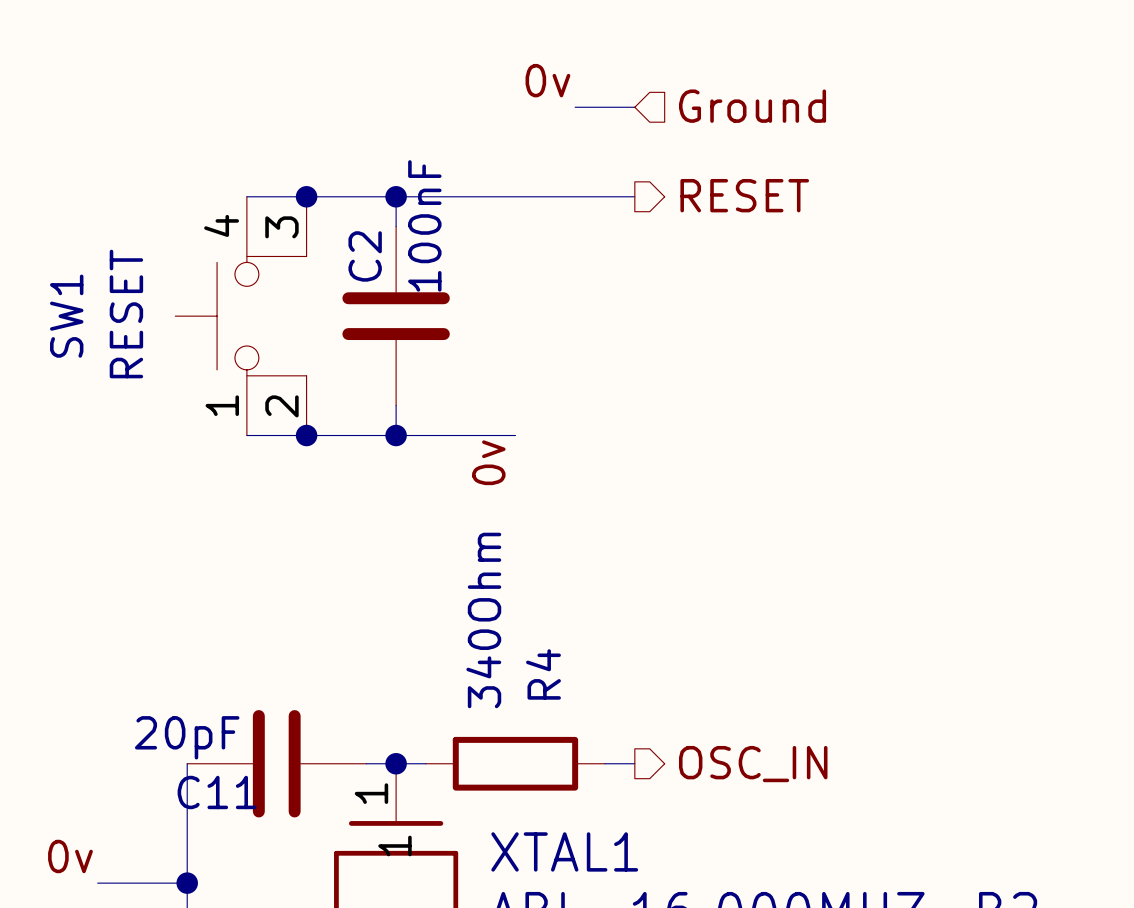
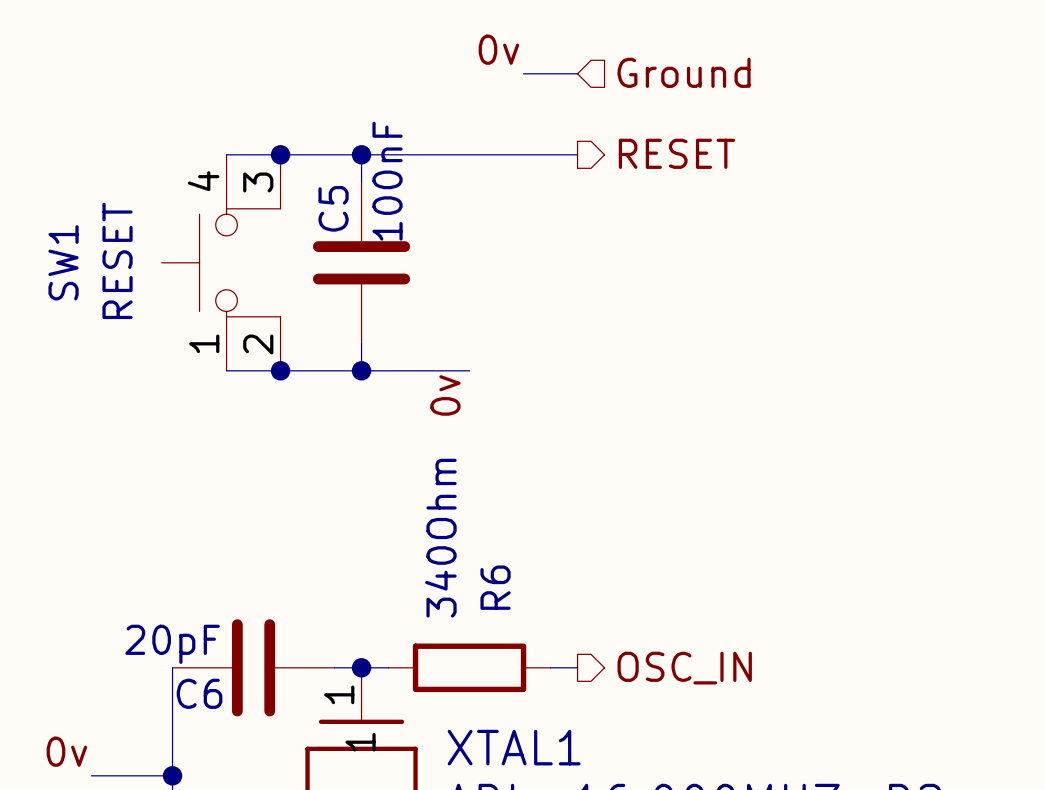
C2 name: C2 (365, 256) -> C5 (333, 208)
R4 name: R4 (543, 674) -> R6 (495, 587)
C11 name: C11 (217, 792) -> C6 (199, 693)

